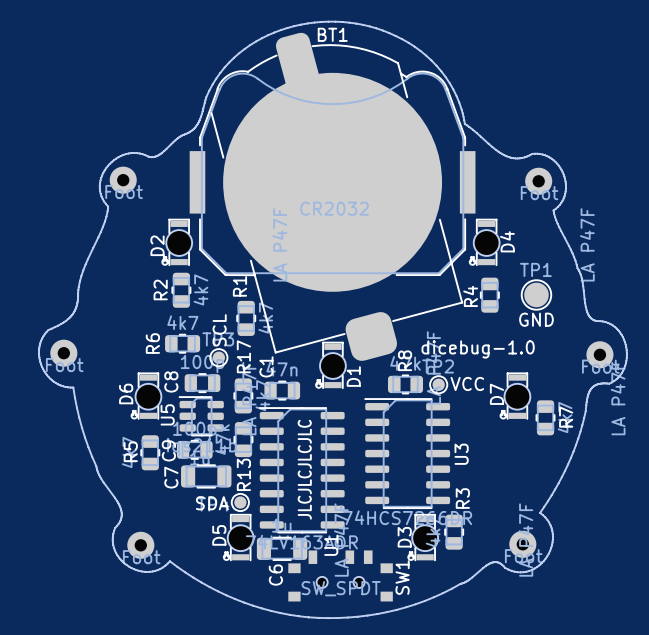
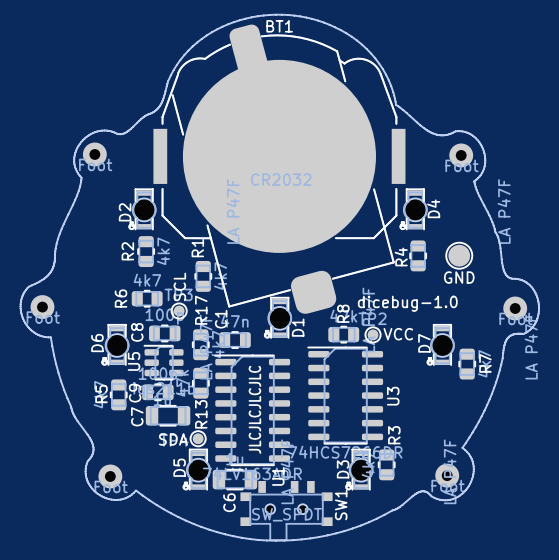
BT1 footprint: [189, 32, 476, 361] -> [153, 24, 406, 314]
D2 footprint: [161, 219, 193, 266] -> [128, 188, 157, 230]
D4 footprint: [469, 219, 500, 266] -> [399, 188, 428, 230]
TP1 name: TP1 (535, 269) -> none
D1 footprint: [315, 342, 346, 389] -> [264, 297, 292, 339]
D6 footprint: [130, 372, 162, 420] -> [101, 324, 129, 366]
D7 footprint: [499, 372, 531, 420] -> [427, 324, 455, 366]
D5 footprint: [223, 514, 254, 561] -> [182, 449, 211, 491]
D3 footprint: [407, 514, 439, 561] -> [345, 449, 373, 491]
SW1 footprint: [288, 550, 393, 602] -> [240, 481, 333, 541]

